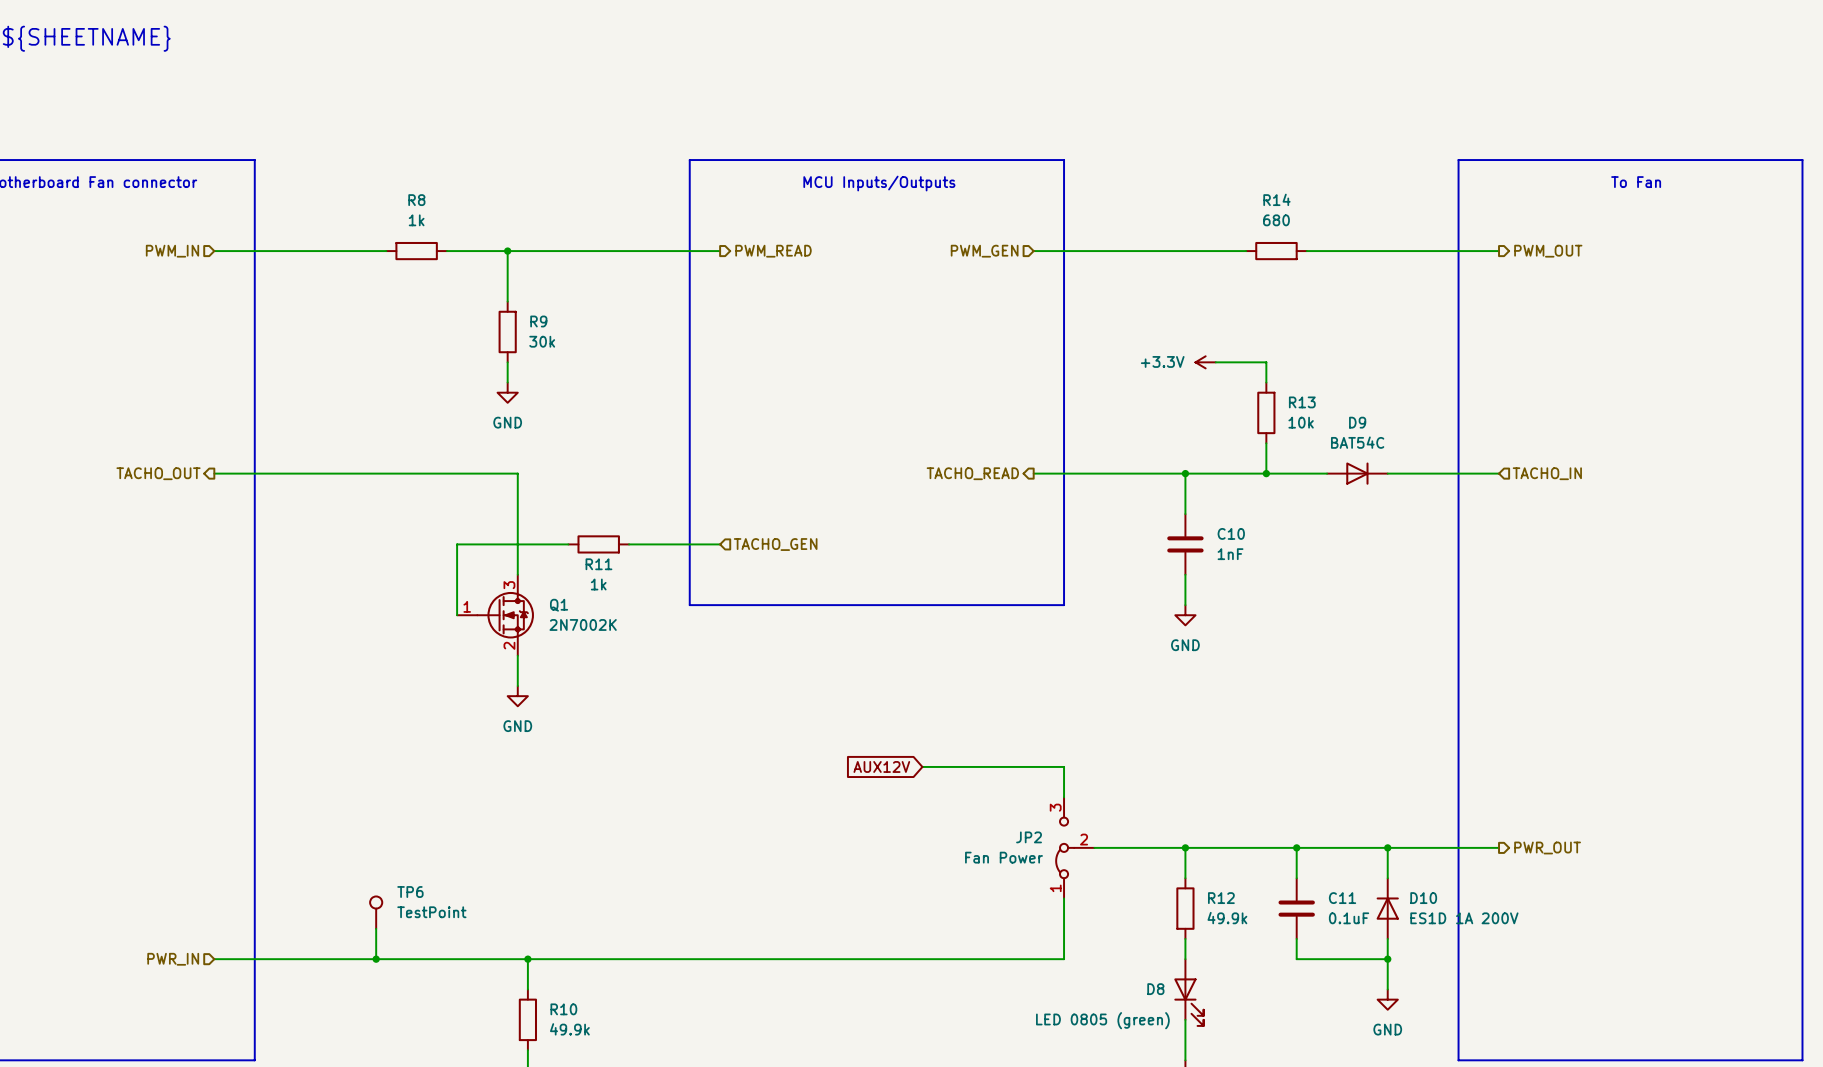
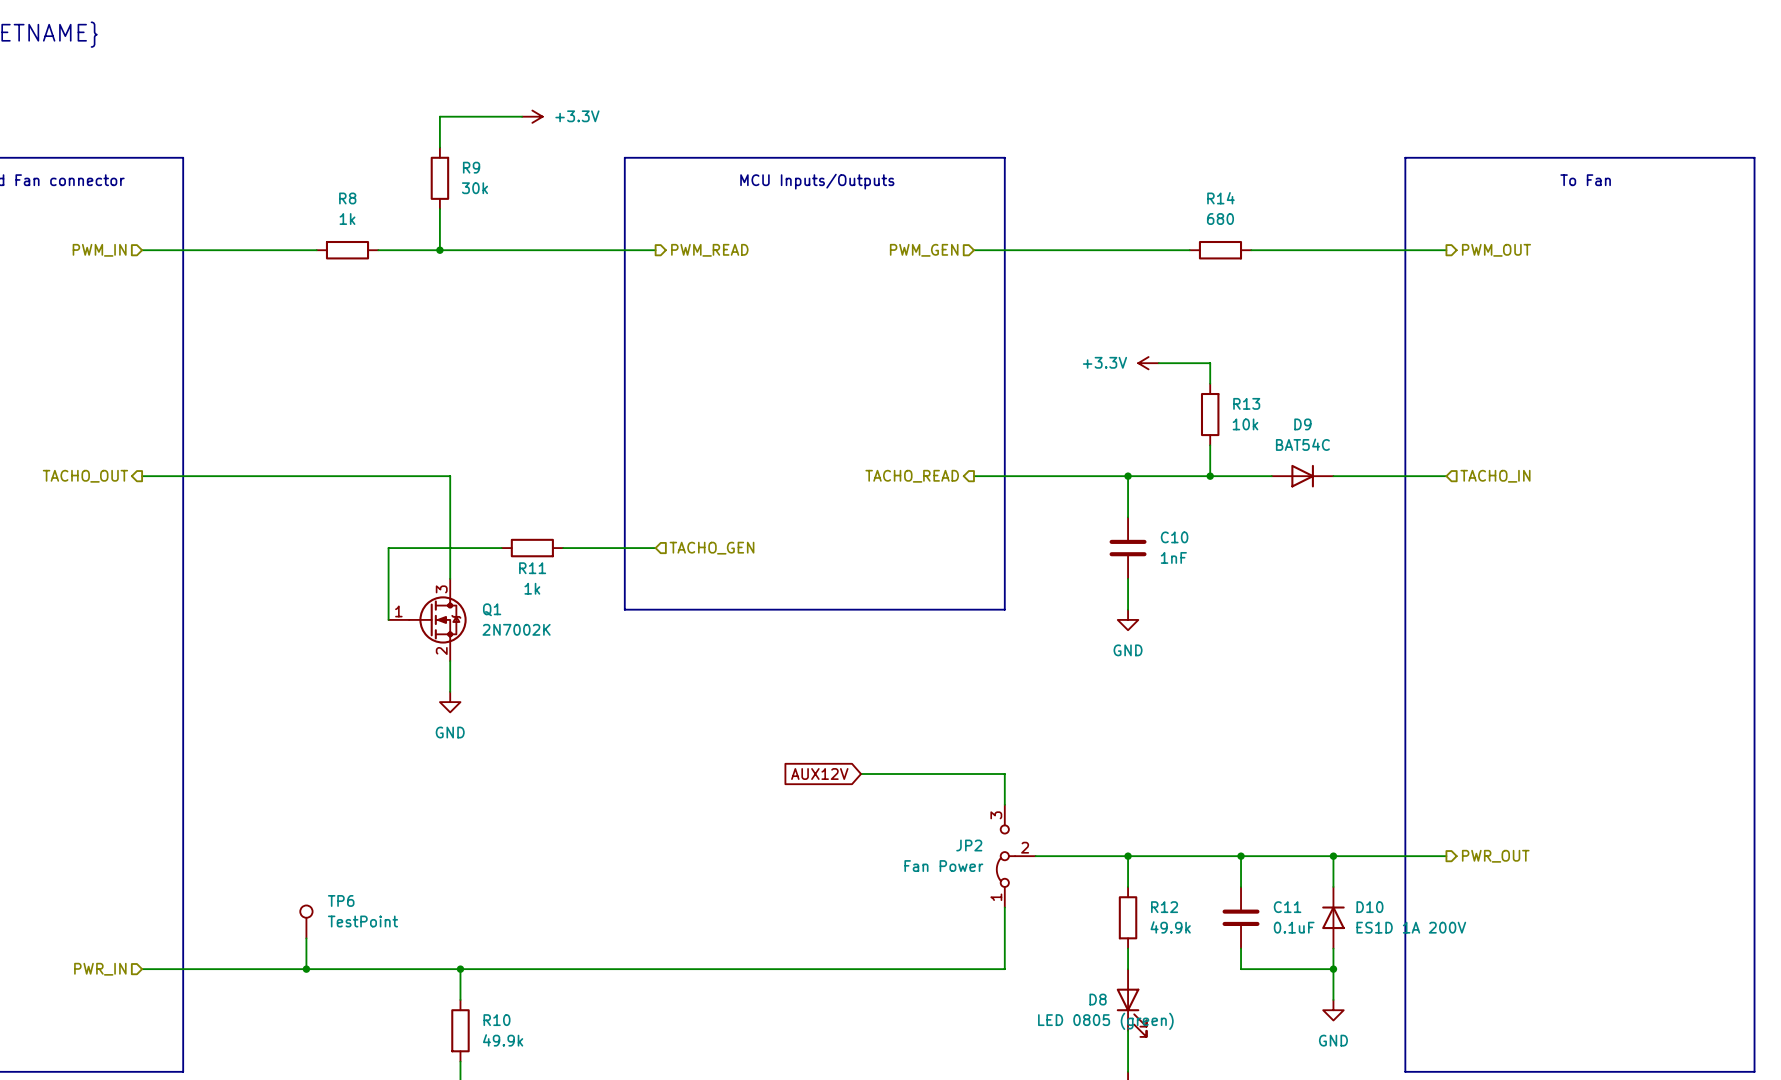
wire: none -> (522, 116) (439, 116) (439, 147)
power symbol: none -> +3.3V (532, 116)
wire: (507, 251) (507, 301) -> (439, 250) (439, 209)
R9 position: (507, 331) -> (439, 178)
wire: (507, 362) (507, 382) -> none
power symbol: GND (507, 392) -> none
D8 value position: LED 0805 (green) (1102, 1020) -> LED 0805 (green) (1105, 1021)

